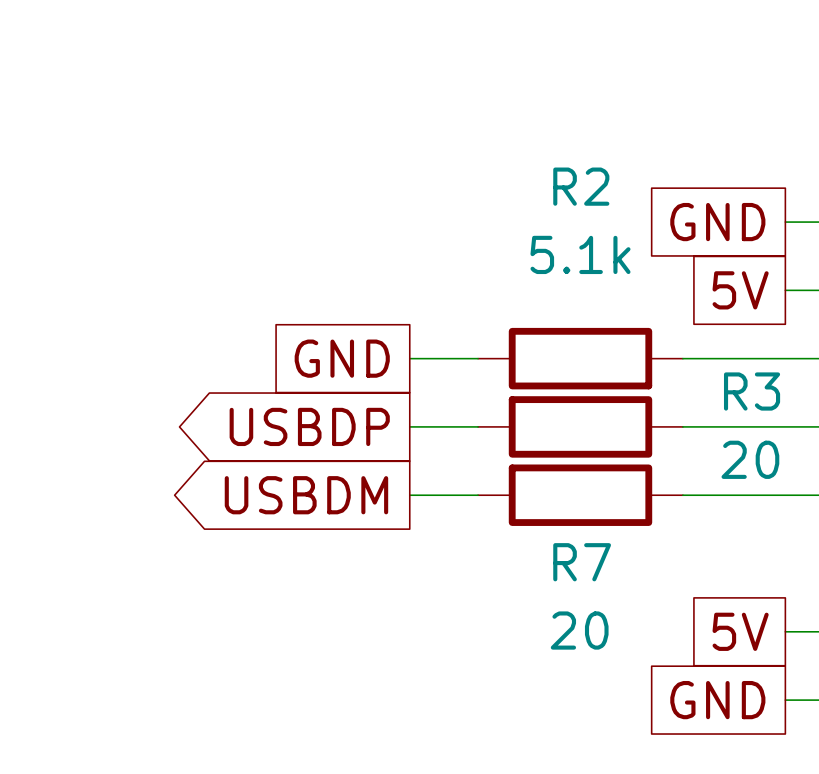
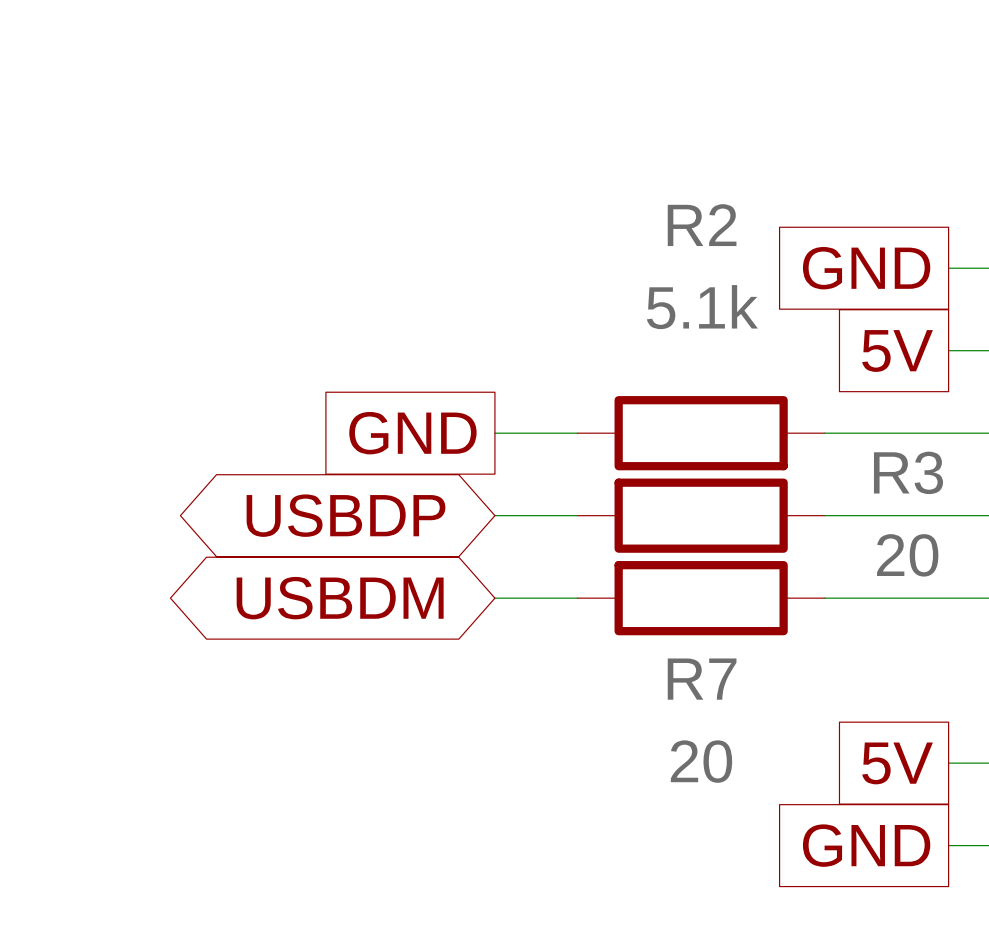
global label shape: output (309, 426) -> bidirectional (346, 515)
global label shape: output (306, 495) -> bidirectional (340, 598)

